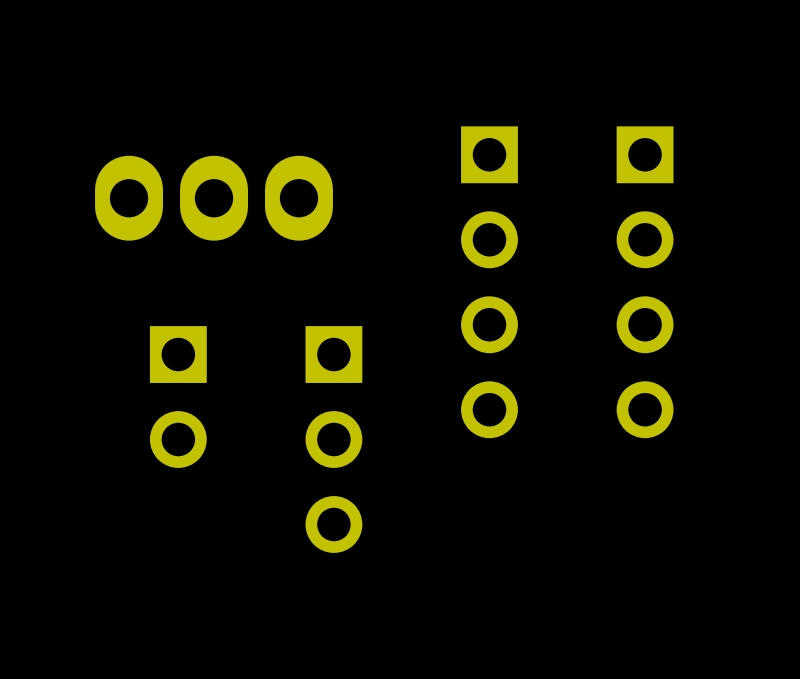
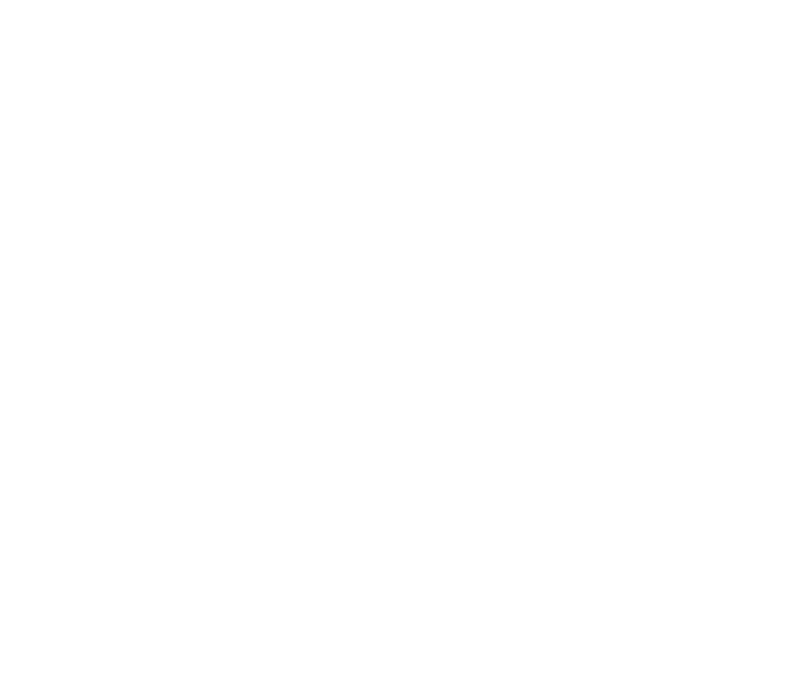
part: (214, 198) -> none
part: (489, 282) -> none
part: (645, 282) -> none
part: (178, 397) -> none
part: (333, 439) -> none

